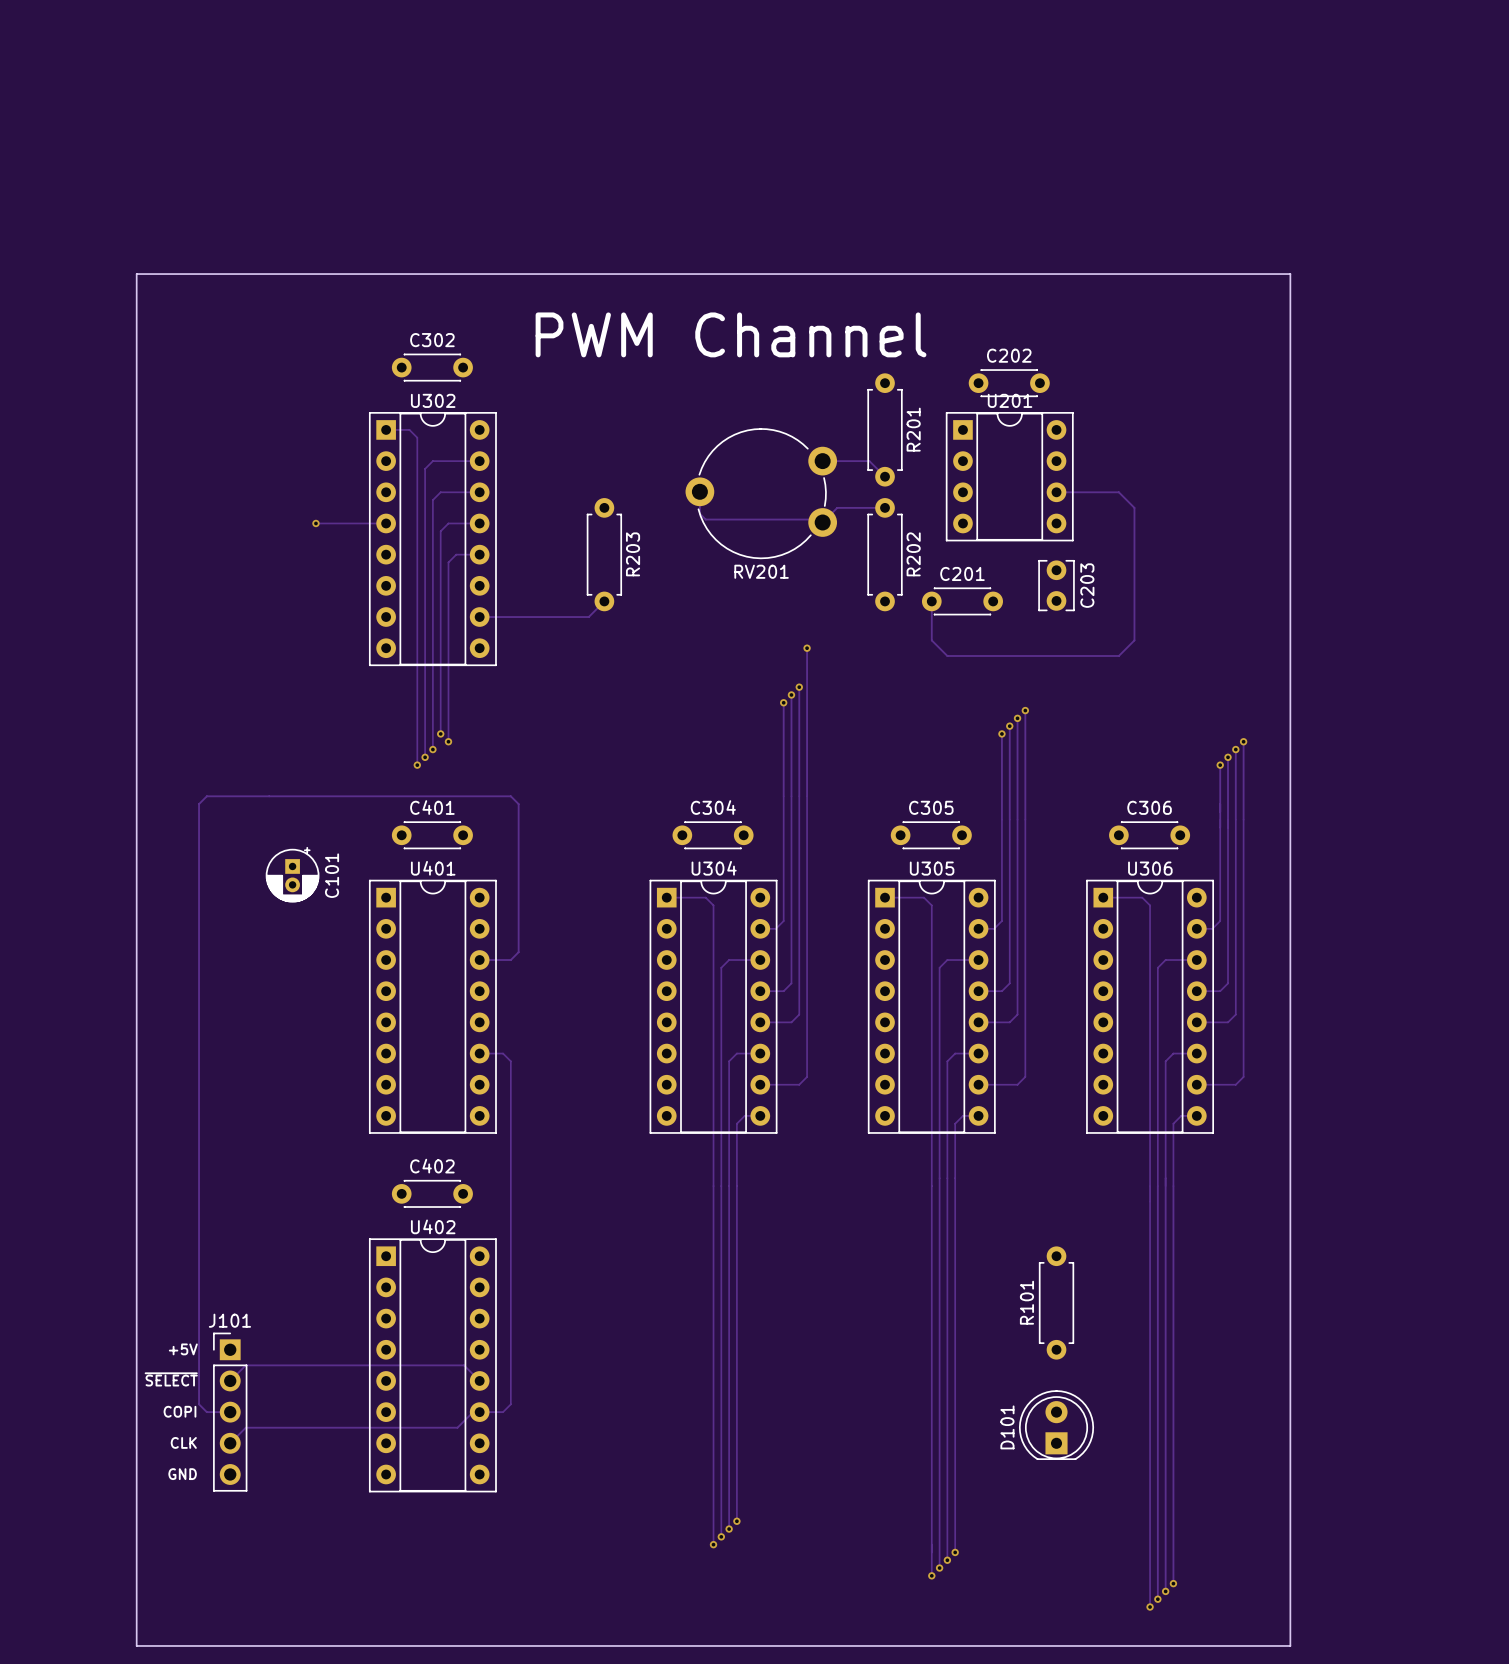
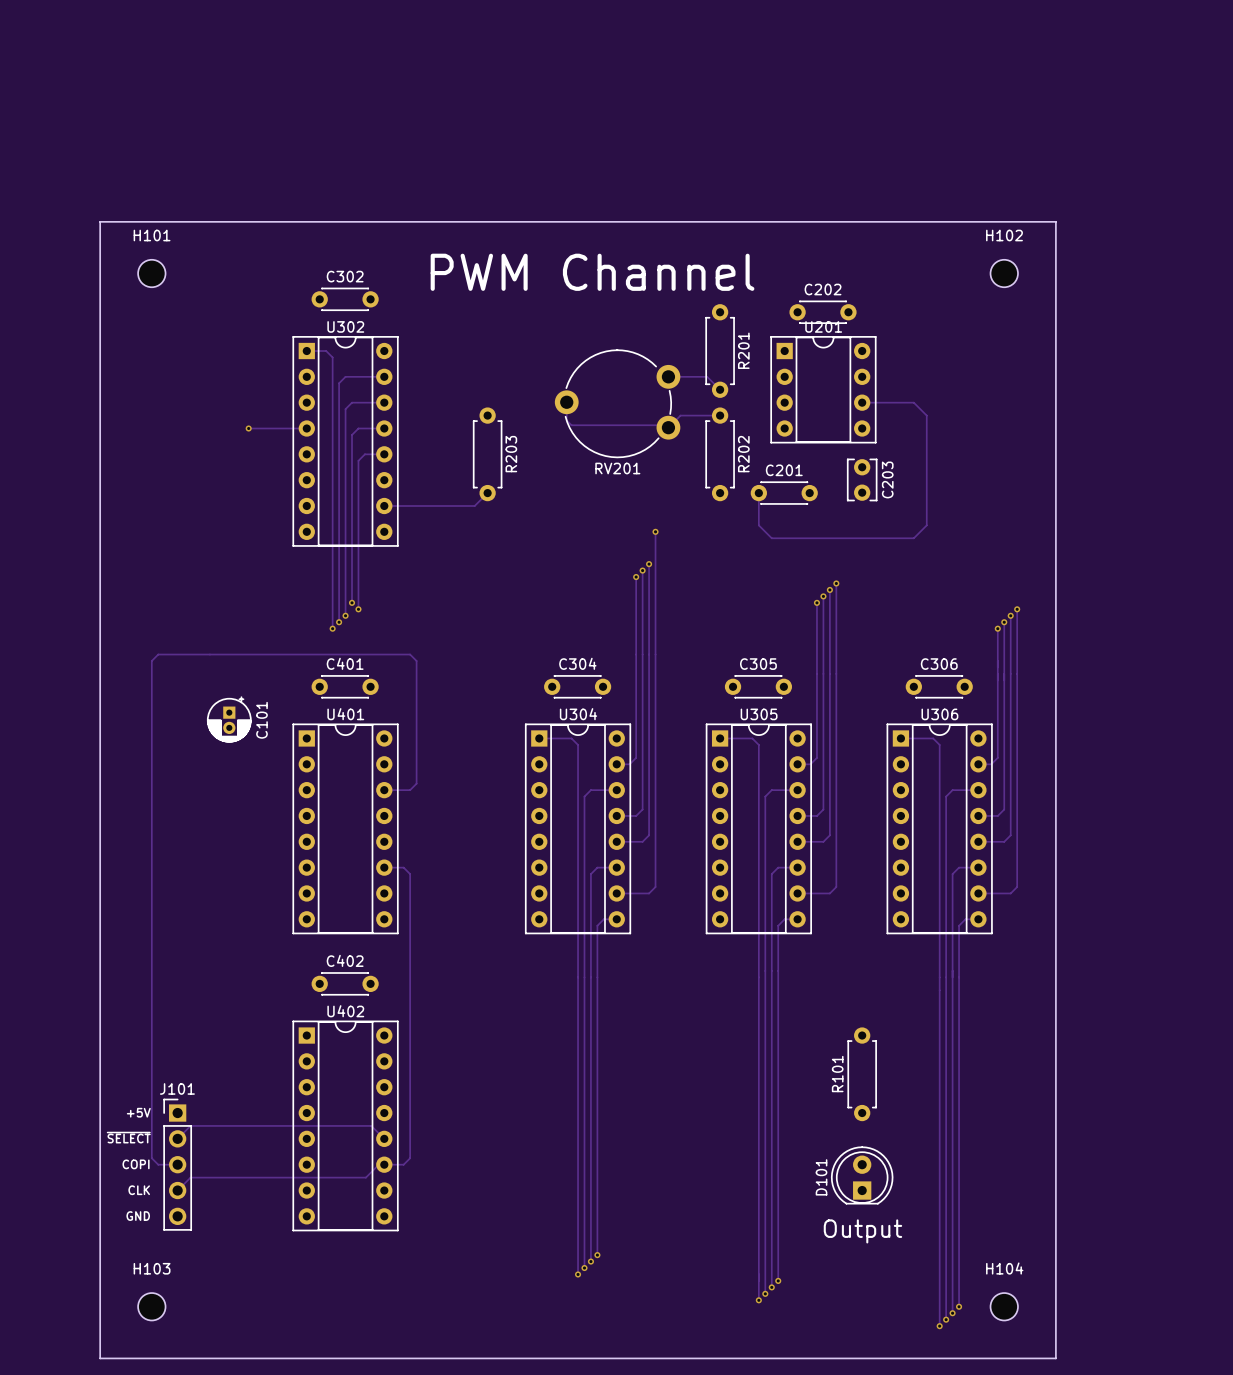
H101: none -> (151, 273)
H102: none -> (1004, 273)
text: none -> Output (862, 1231)
H103: none -> (151, 1306)
H104: none -> (1004, 1306)

